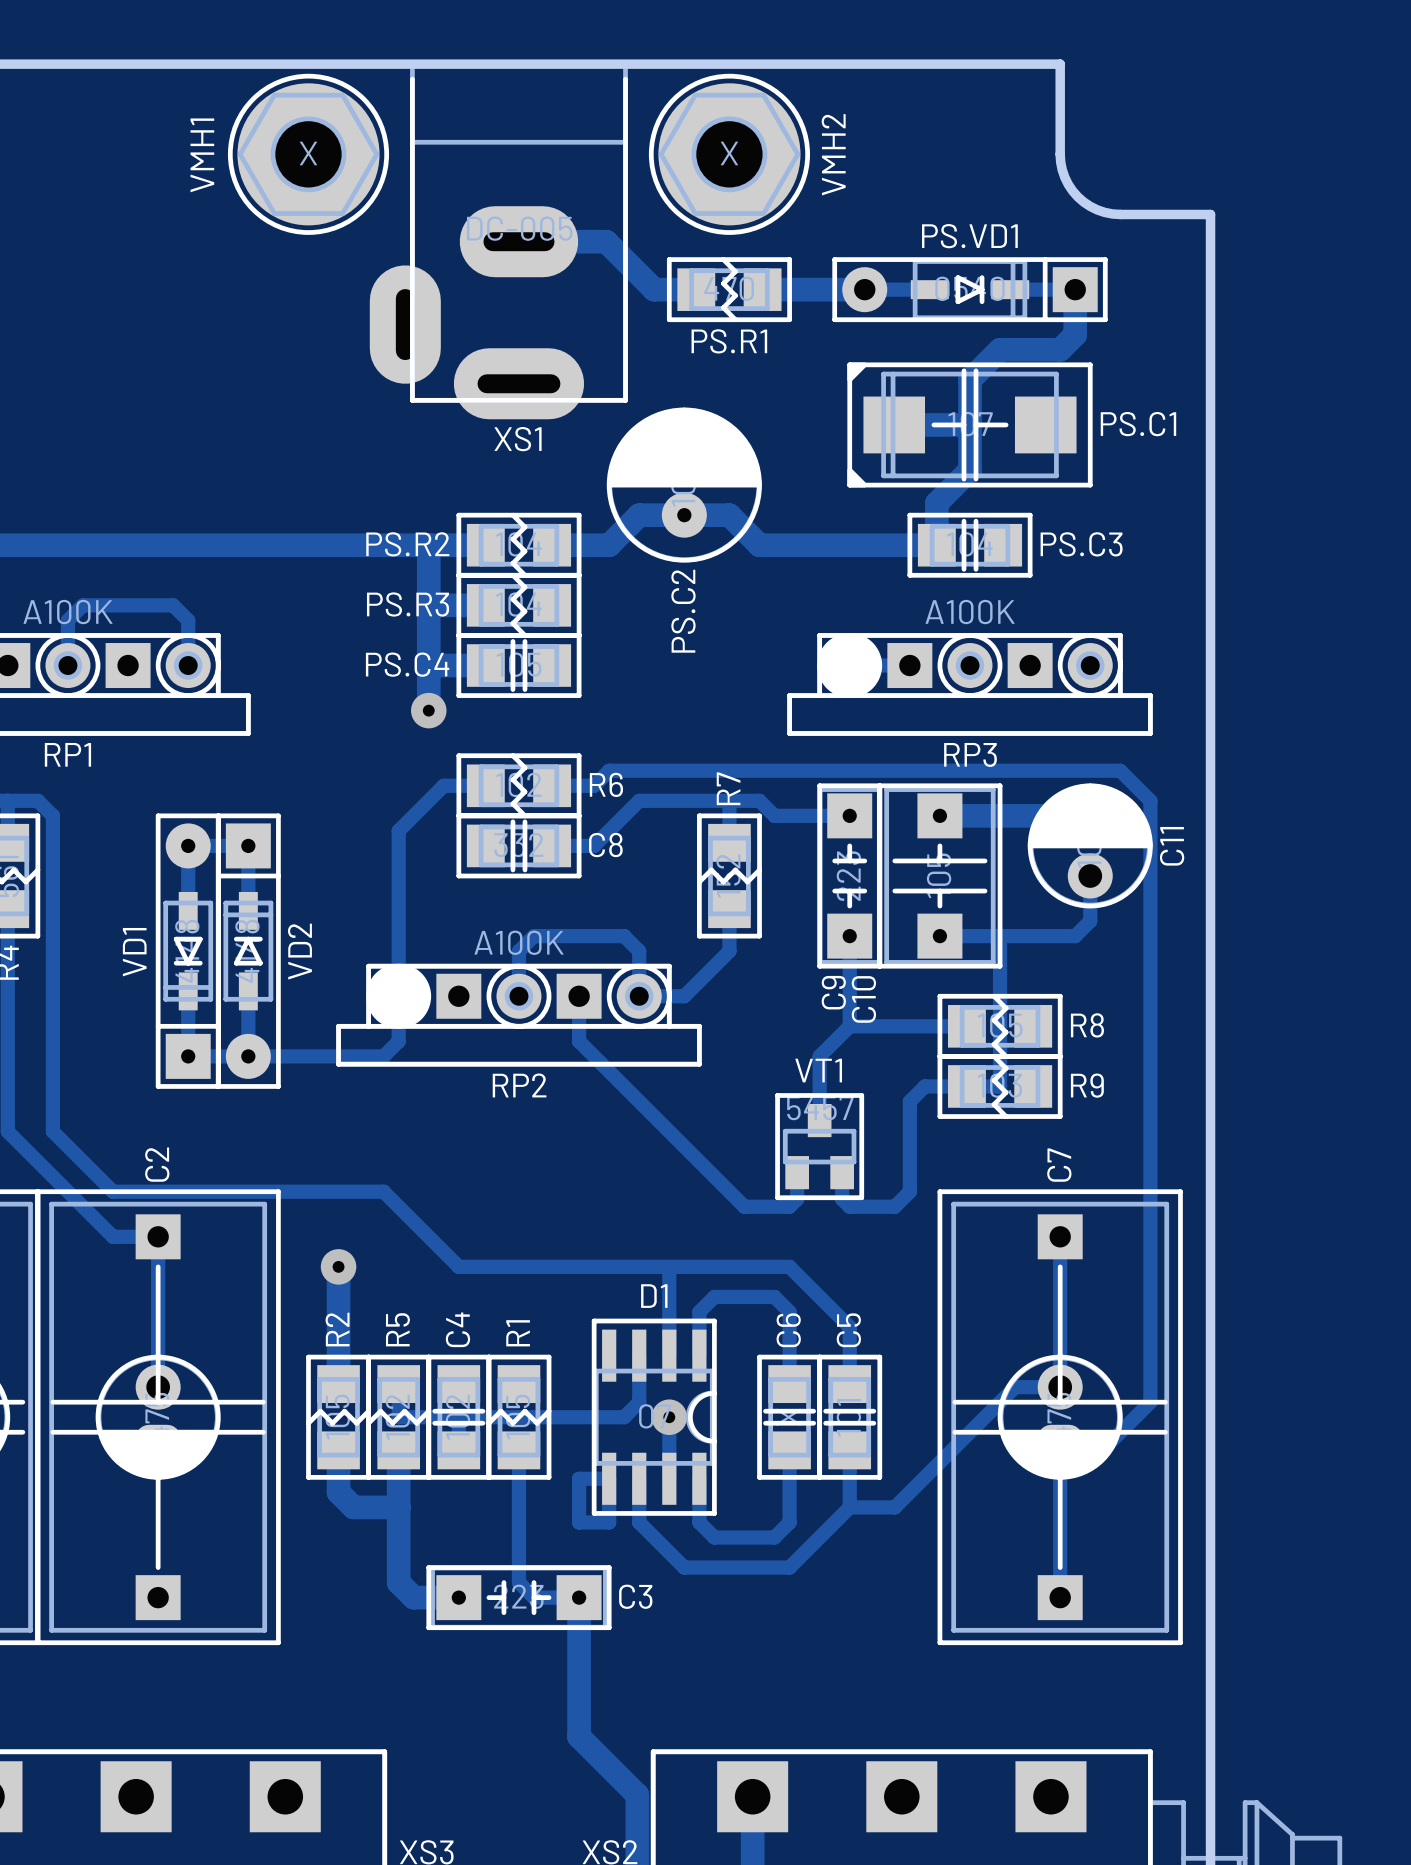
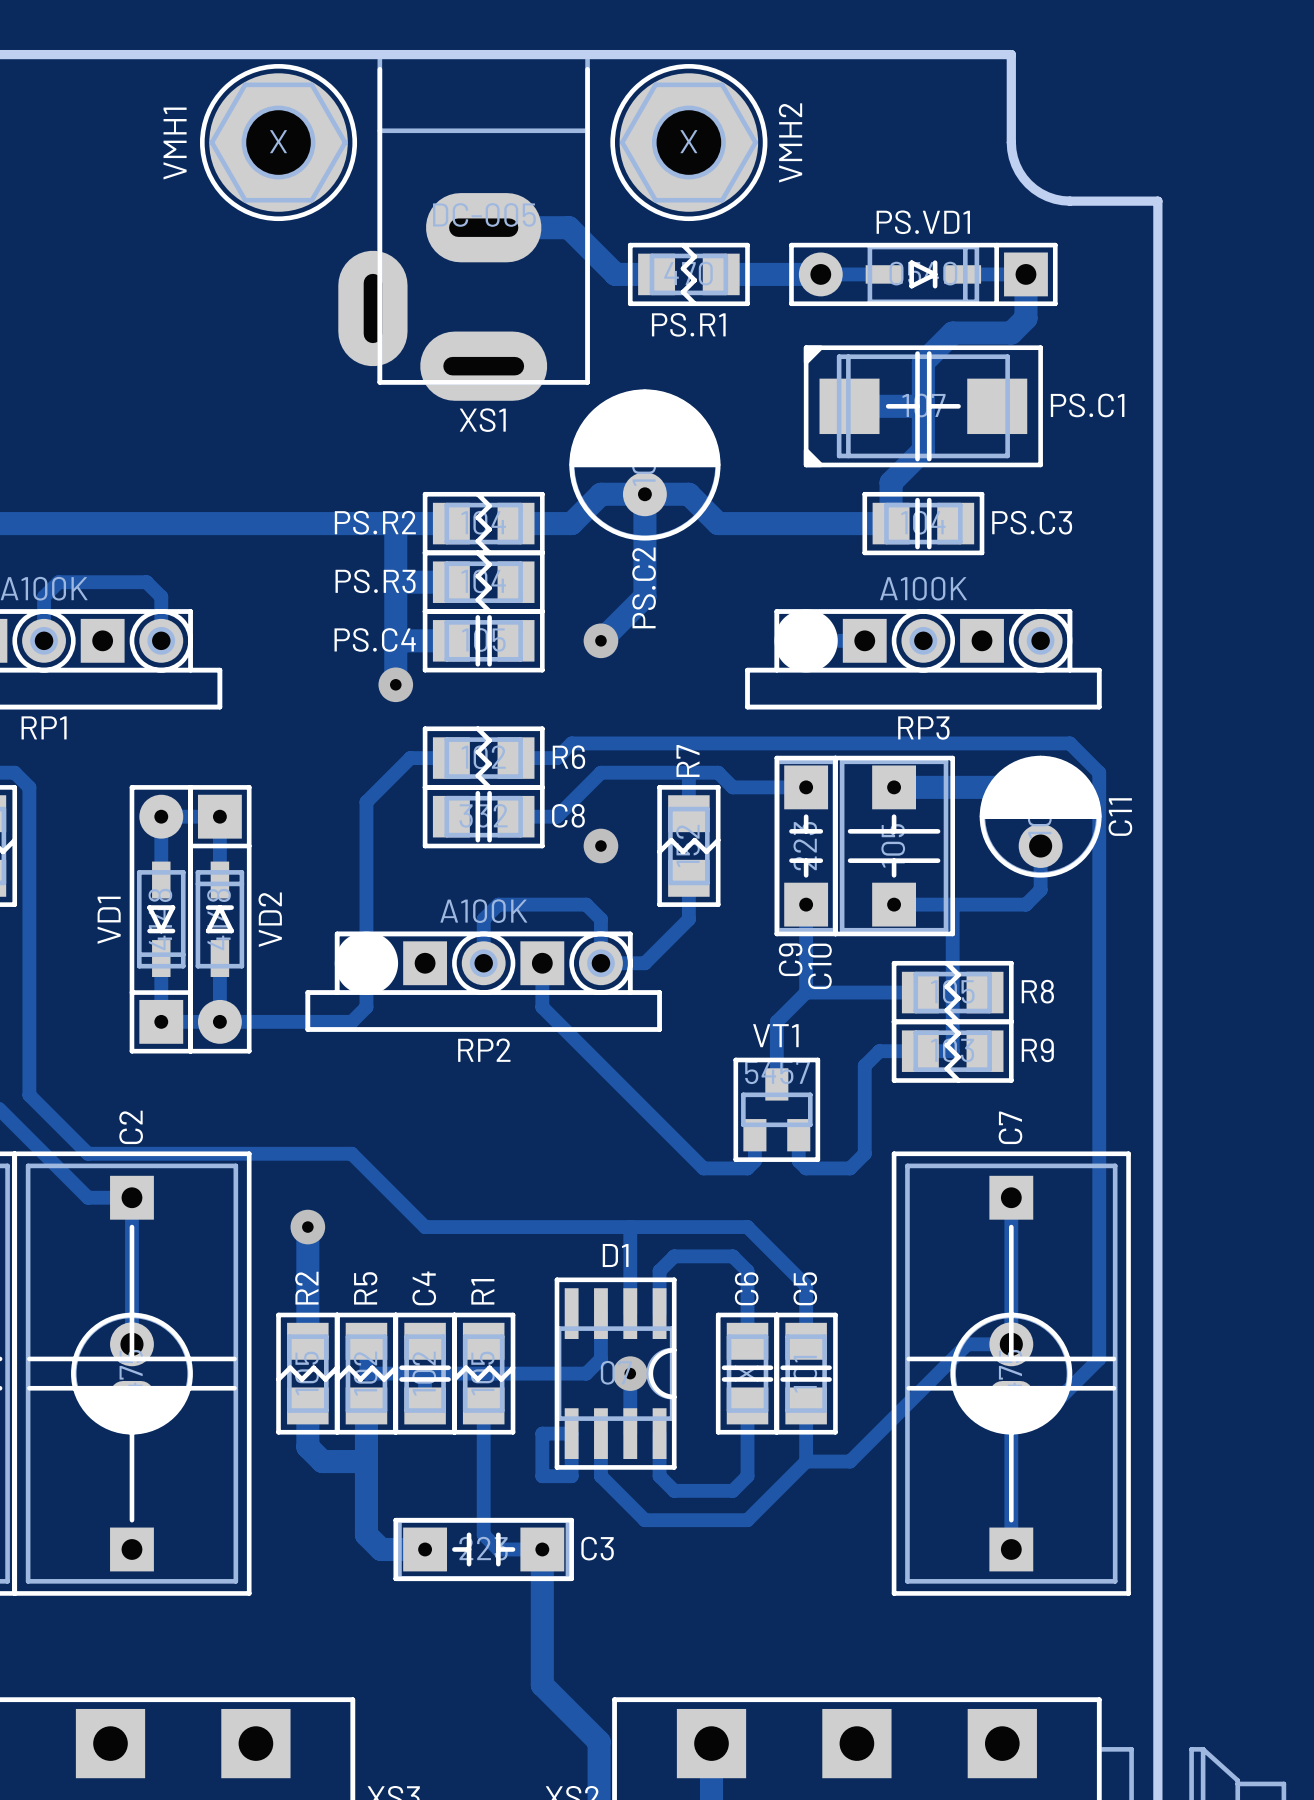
track: none -> (644, 494) (644, 596) (600, 640)
via: none -> (600, 640)
via: none -> (600, 846)

